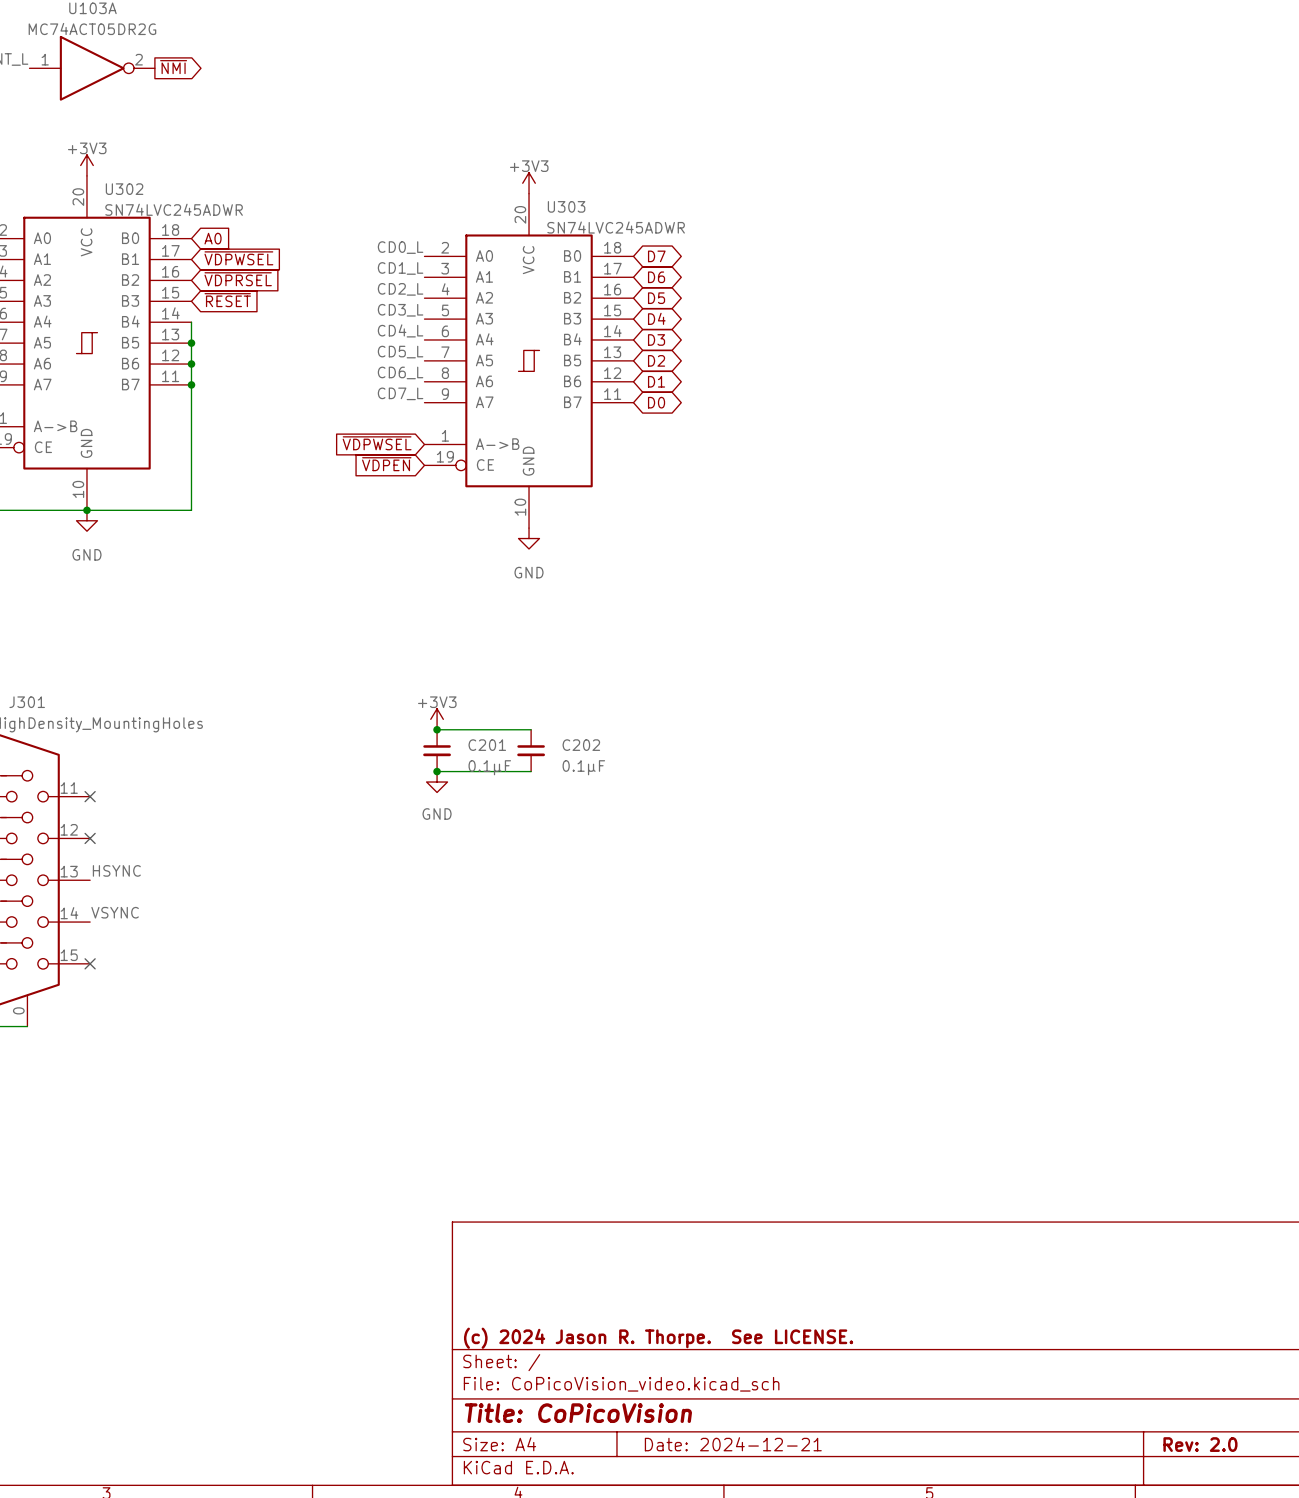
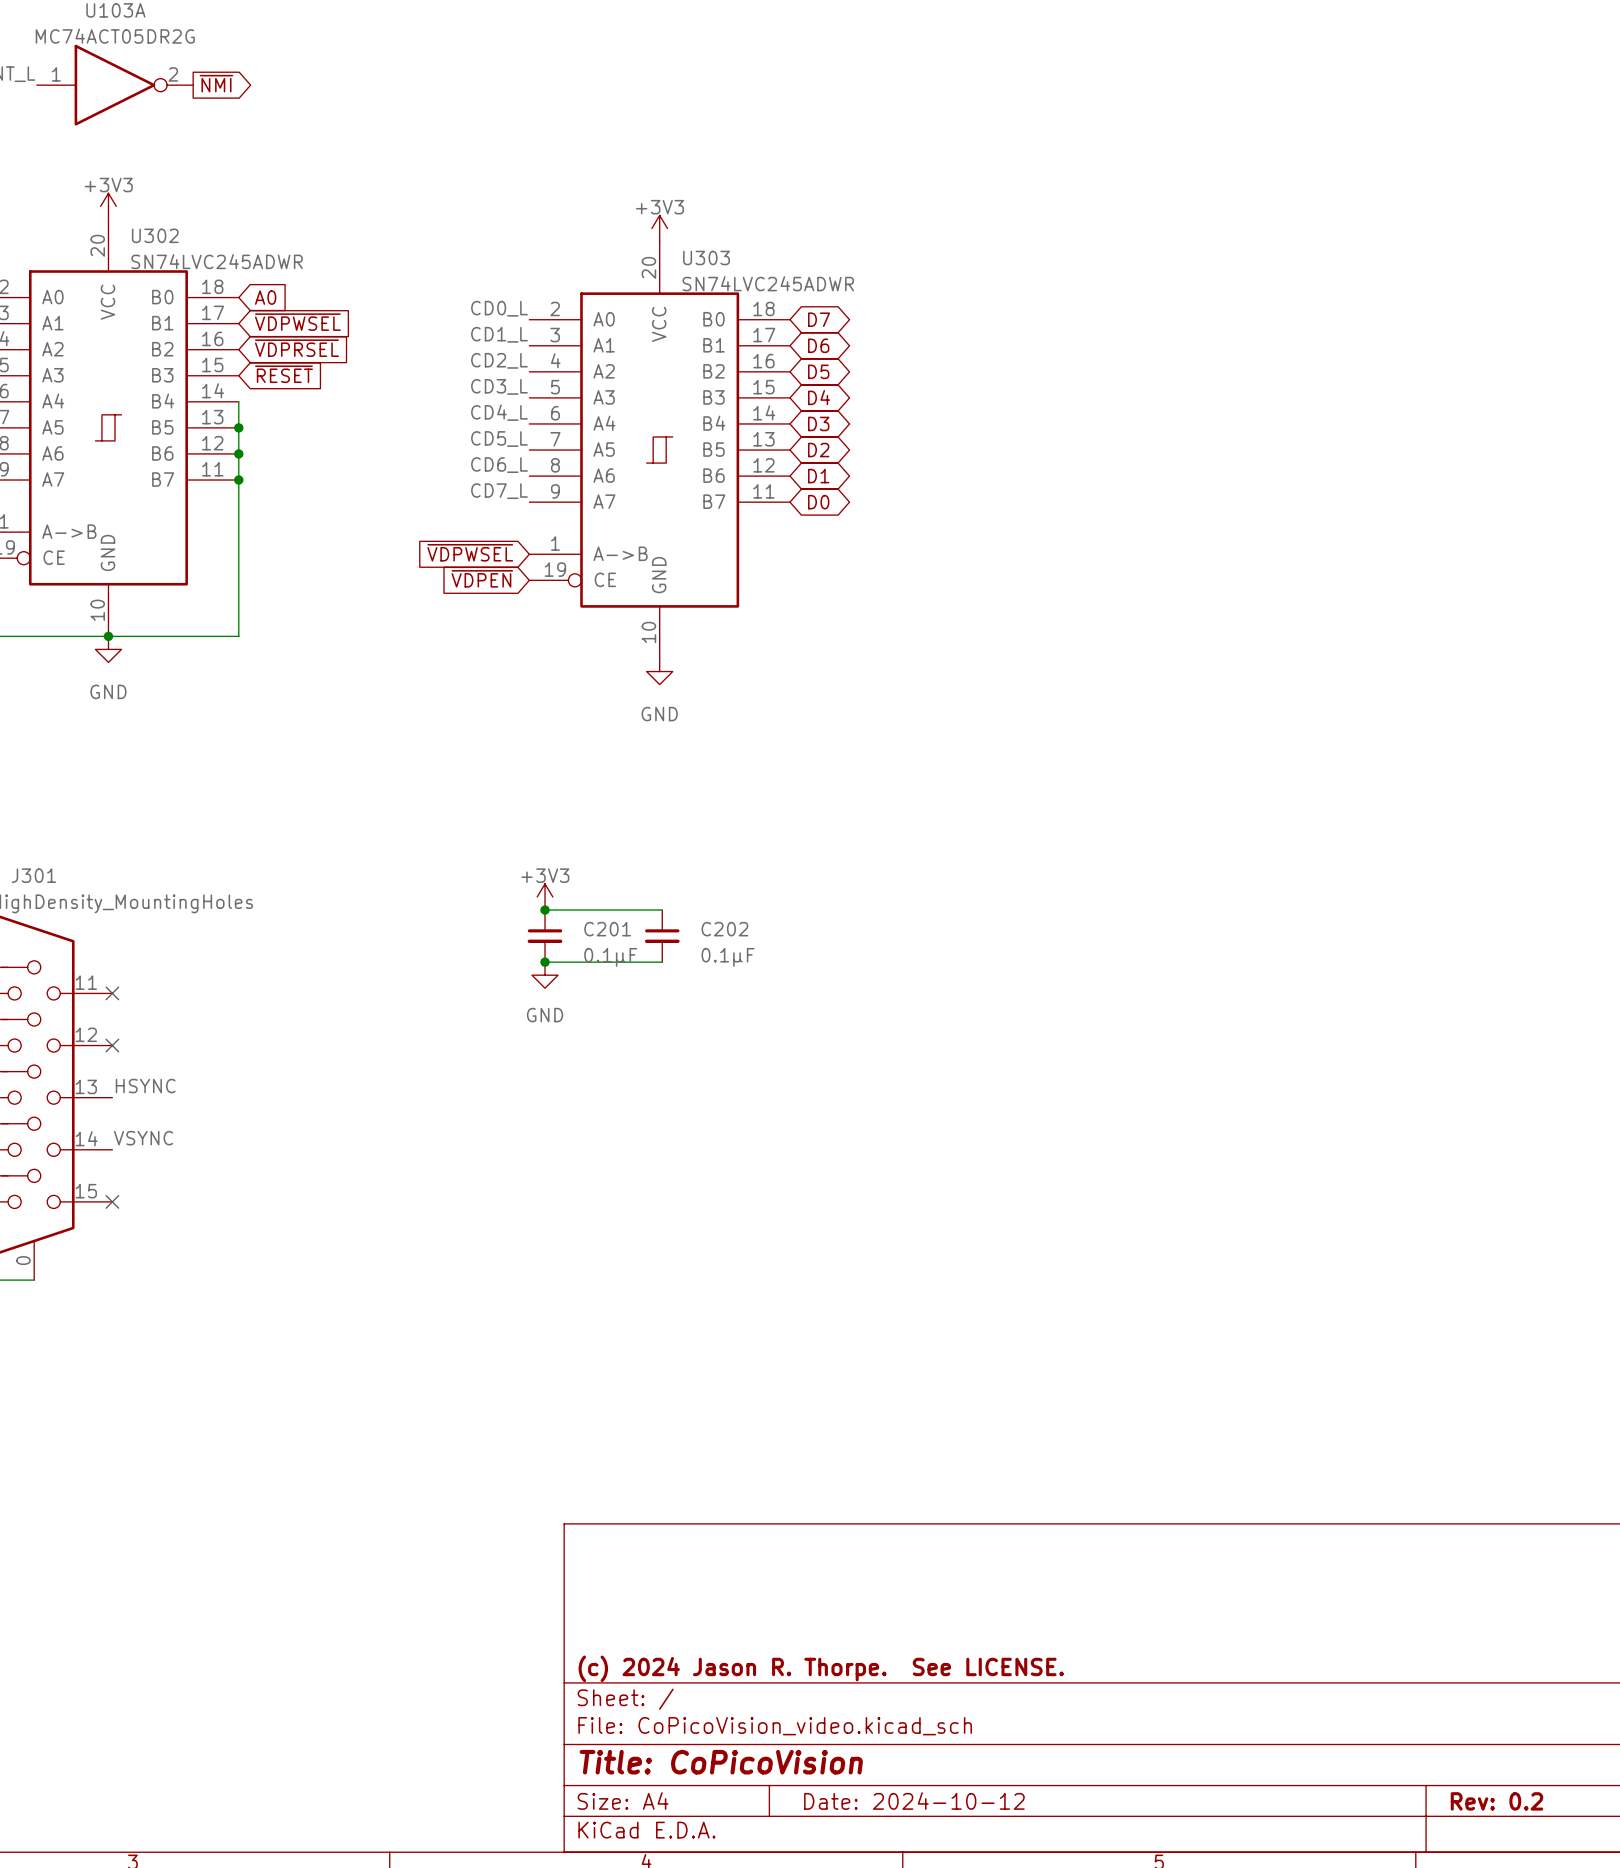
title block: Date: 2024-12-21 (733, 1444) -> Date: 2024-10-12 (914, 1801)
title block: Rev: 2.0 (1200, 1444) -> Rev: 0.2 (1496, 1801)

